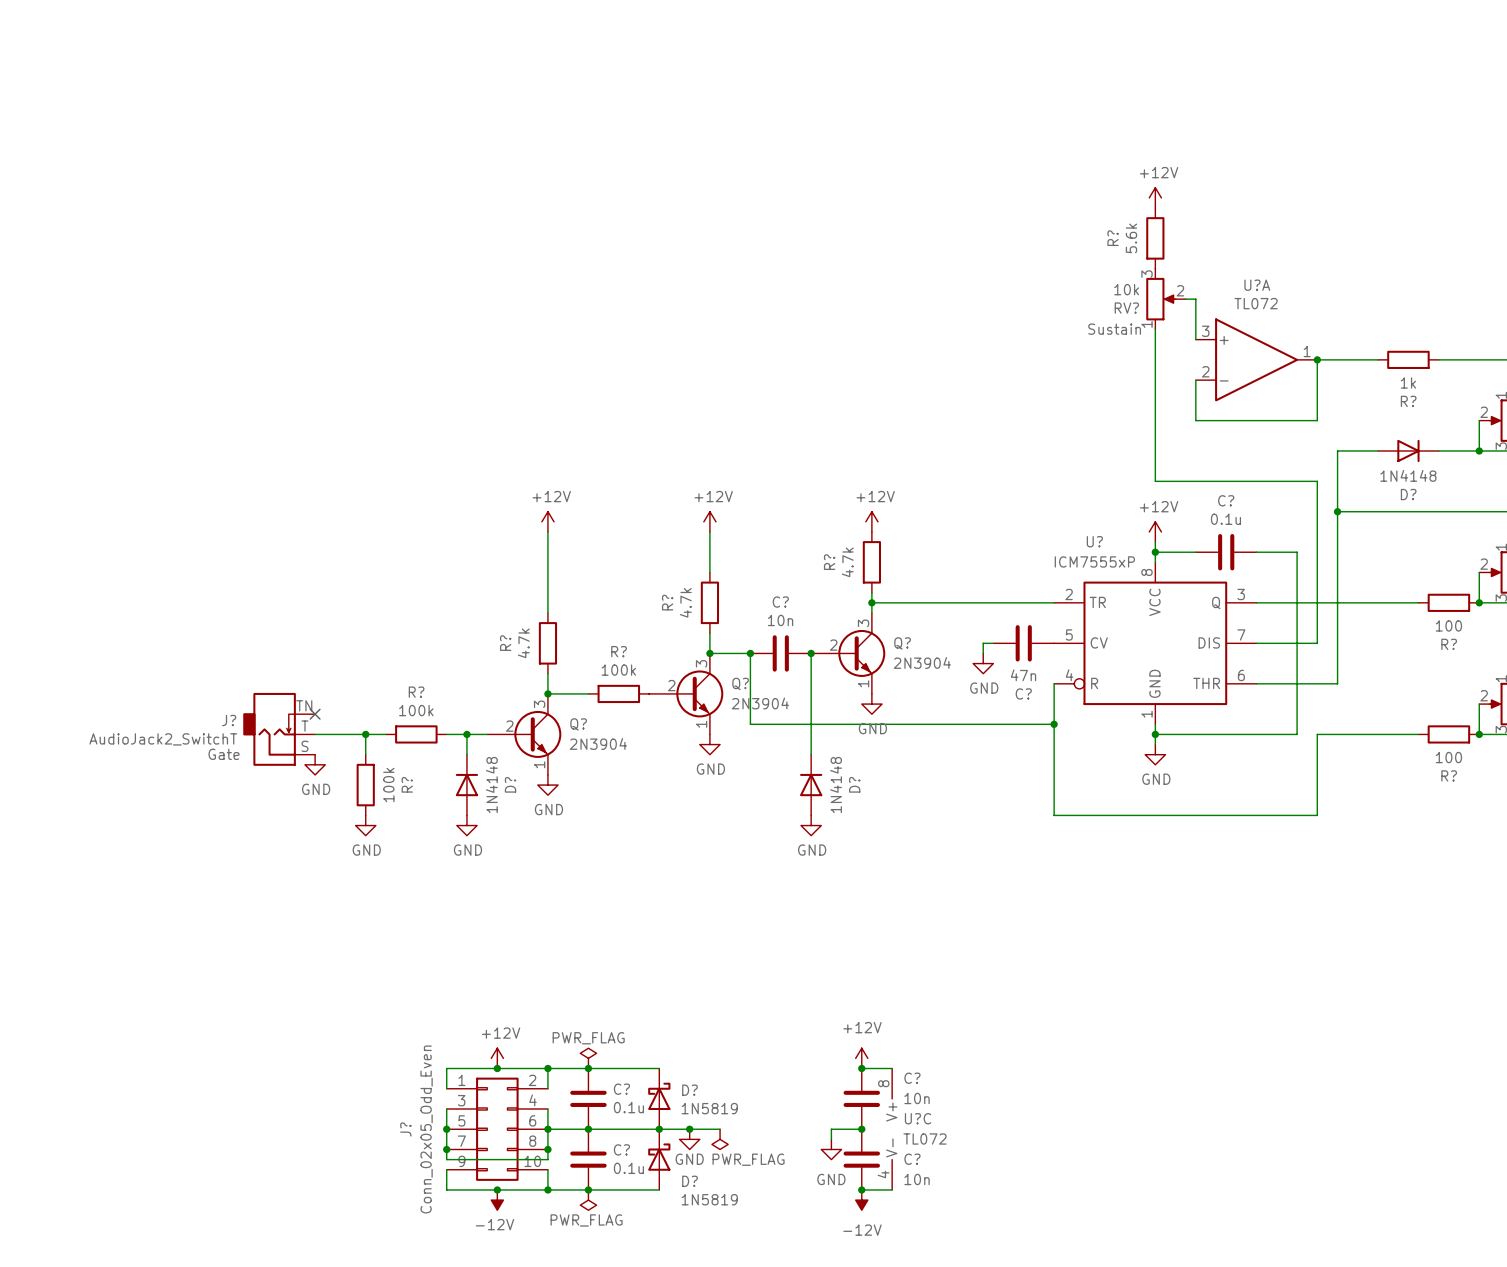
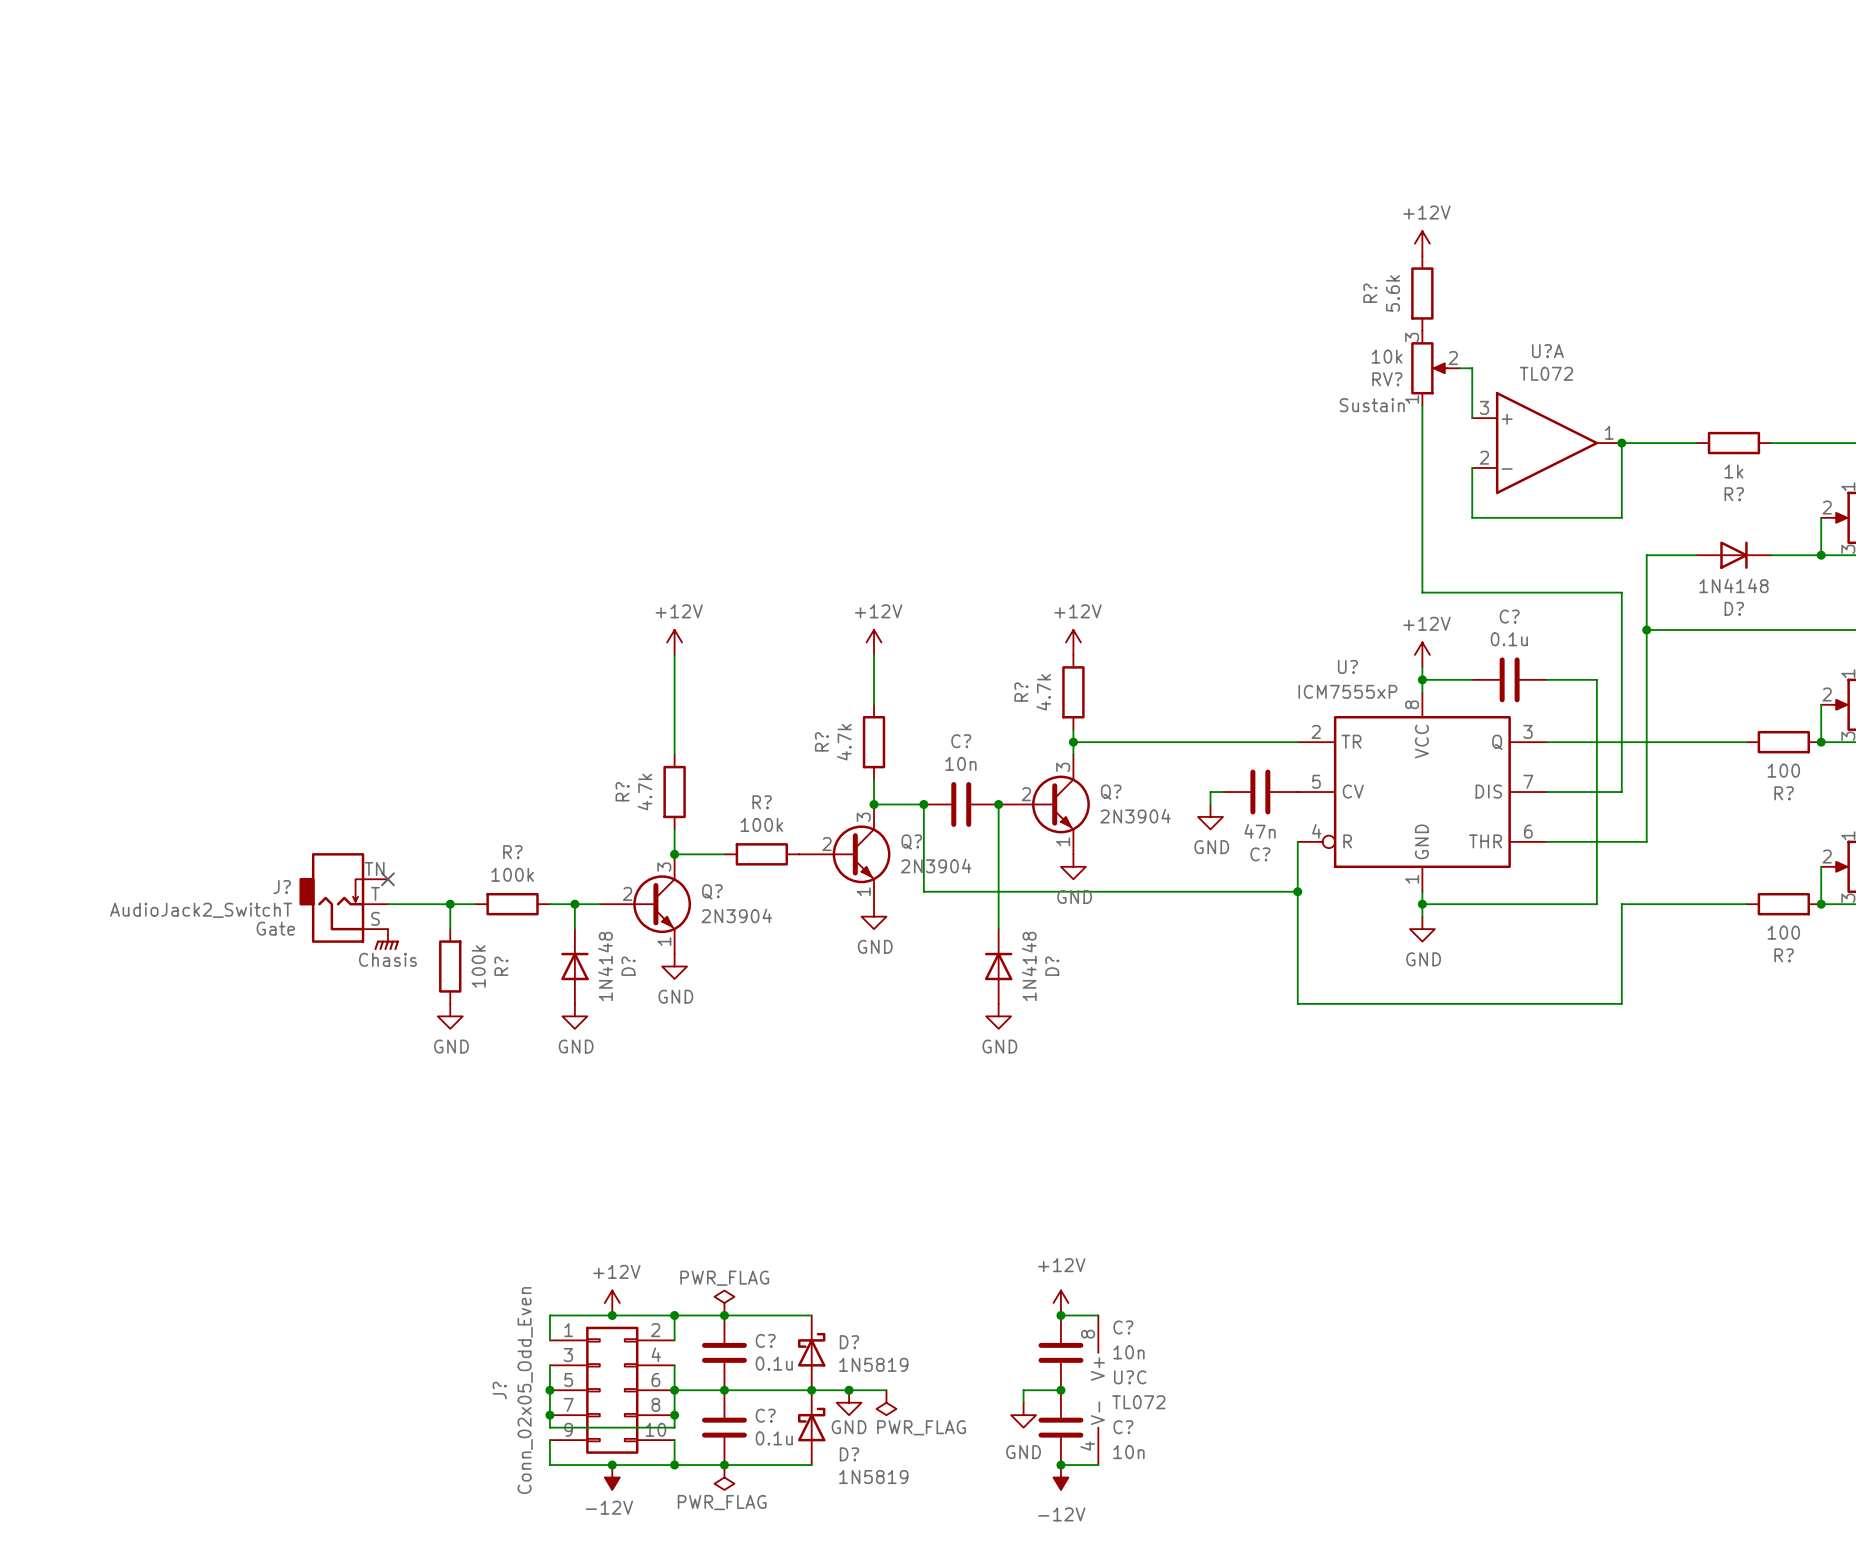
power symbol: GND (315, 764) -> Chasis (386, 939)

